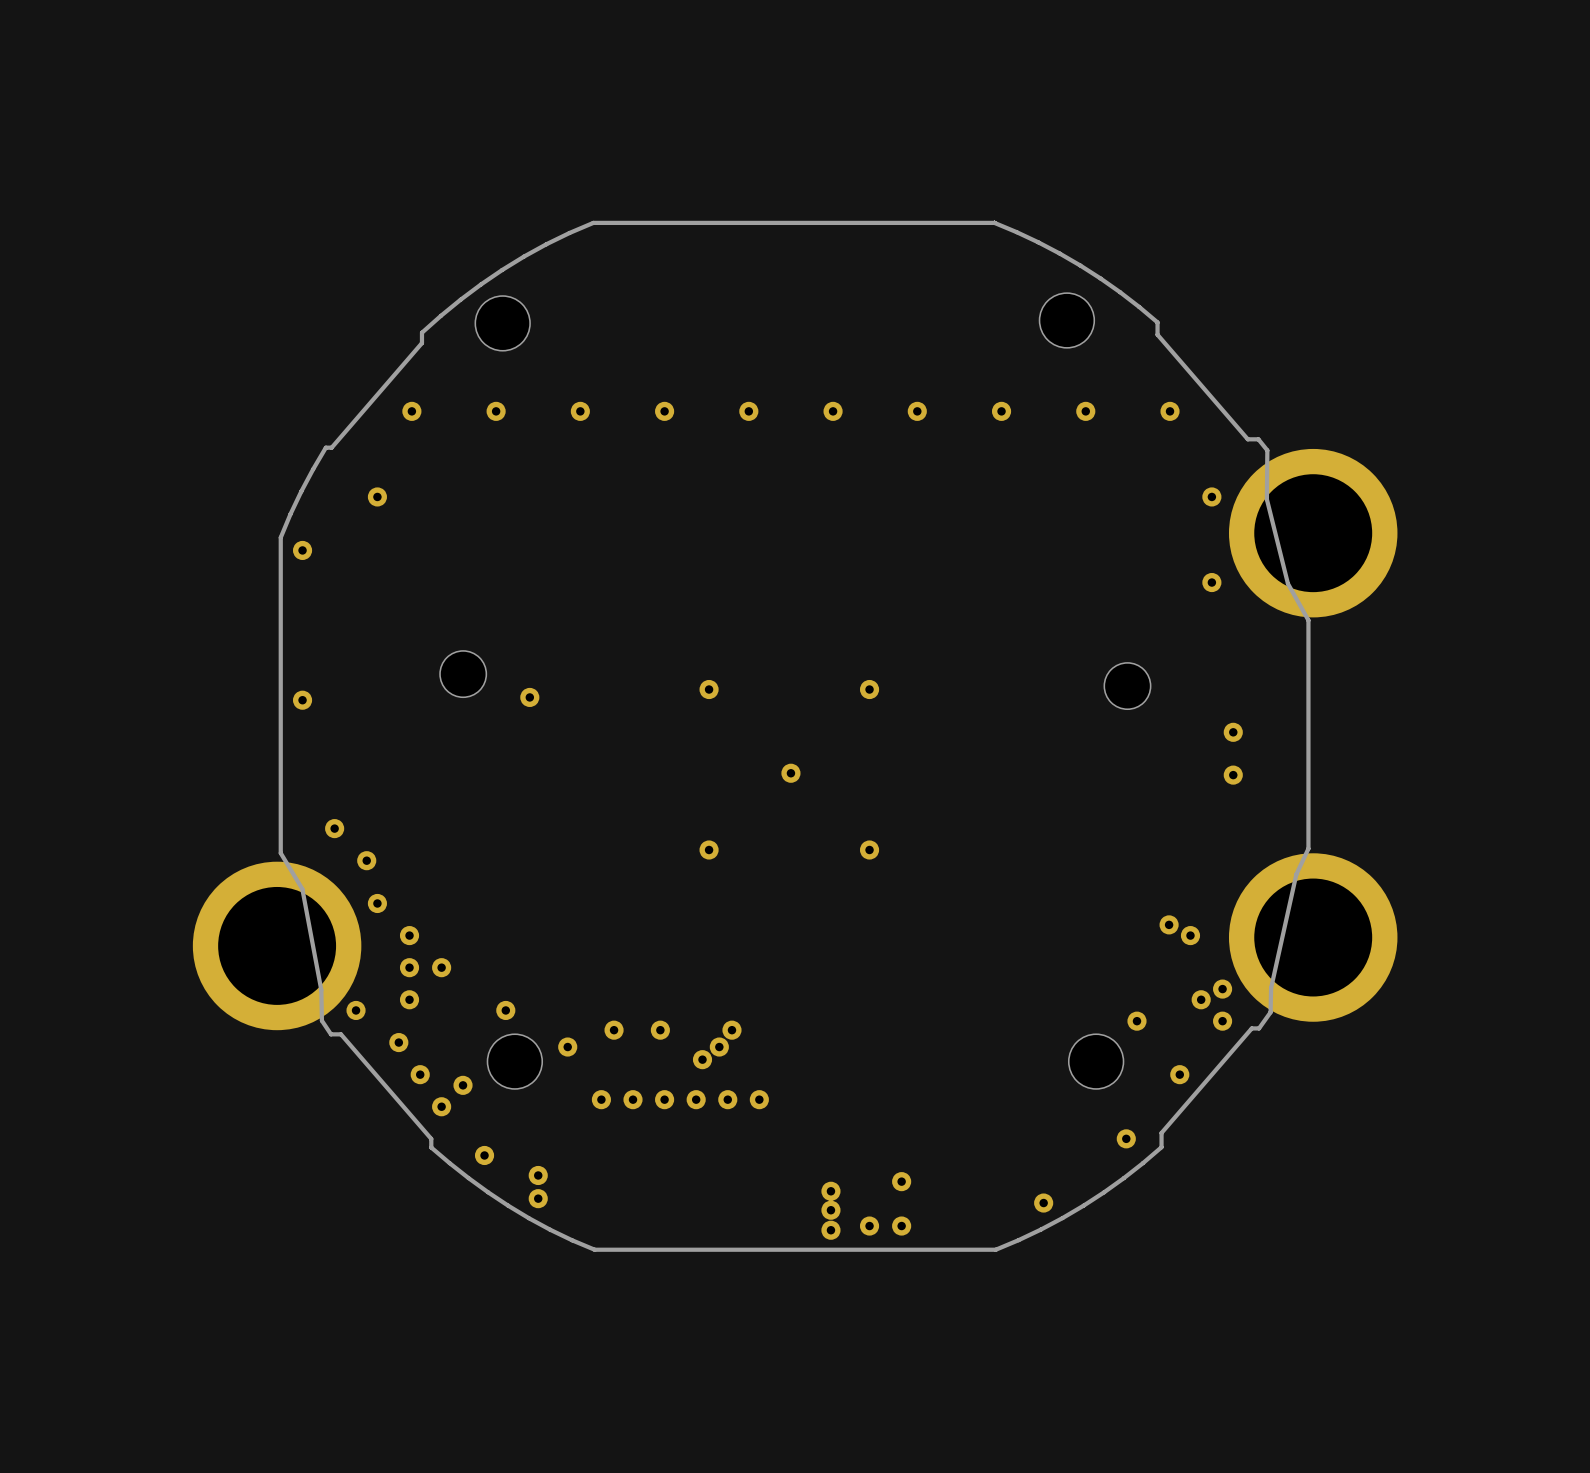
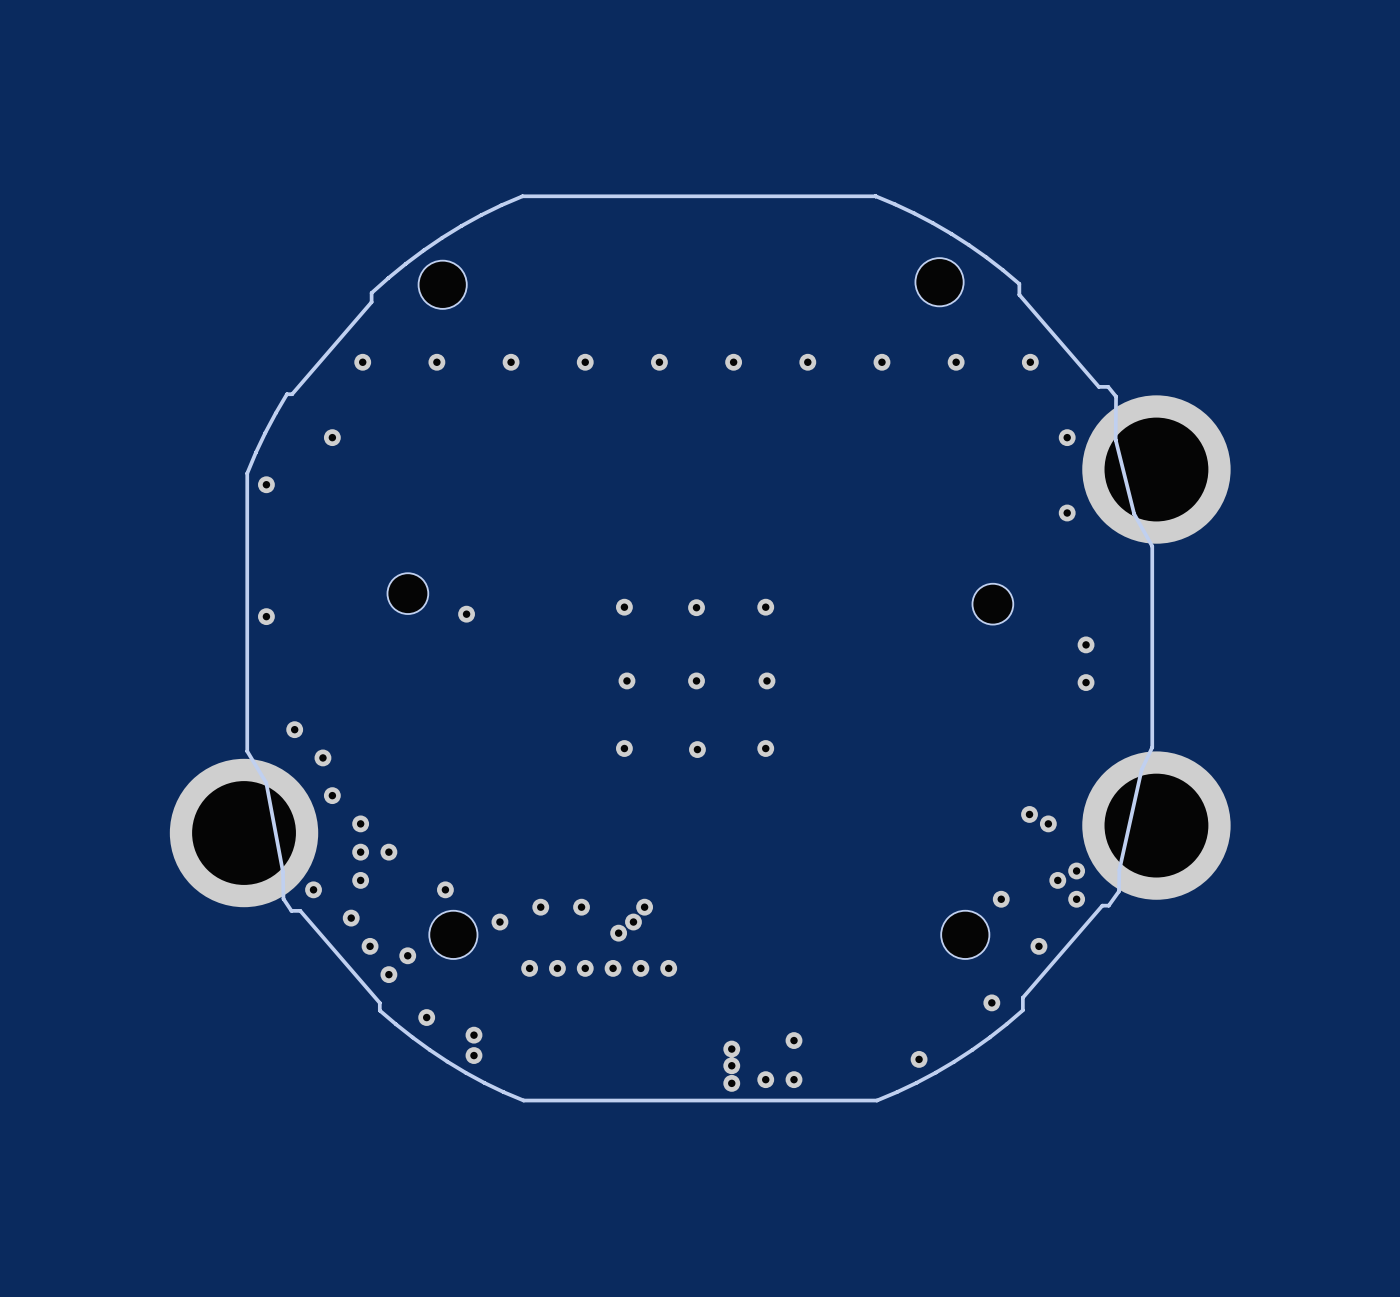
part: none -> (696, 607)
part: none -> (626, 680)
part: none -> (766, 680)
part: none -> (697, 749)

